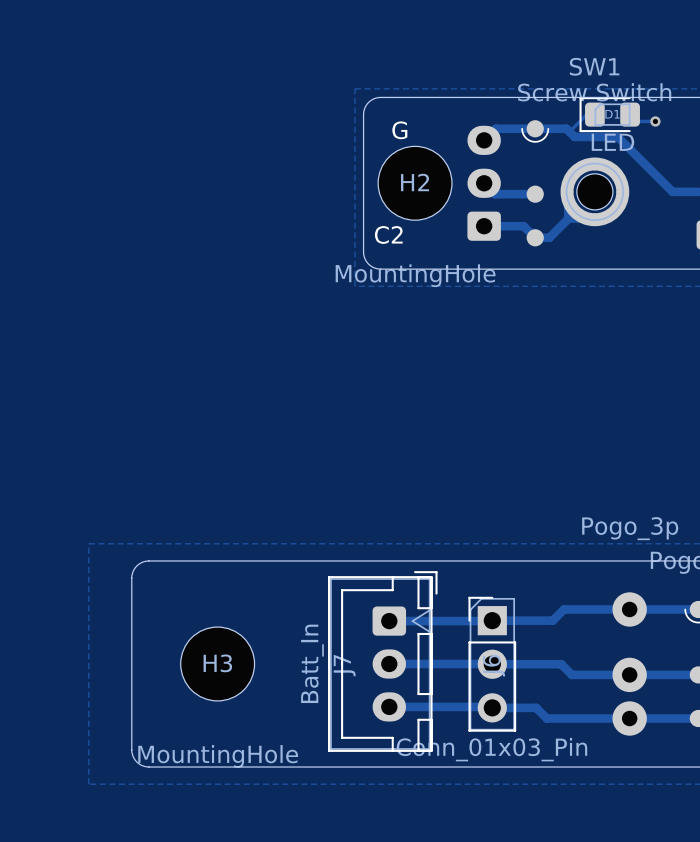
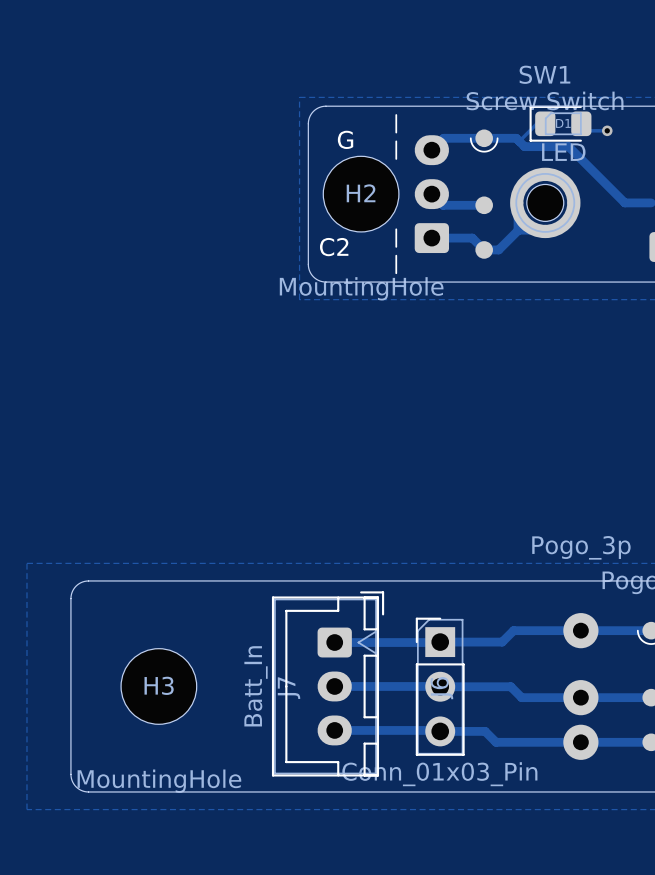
line: none -> (396, 114) (396, 132)
line: none -> (396, 141) (396, 158)
line: none -> (396, 229) (396, 246)
line: none -> (396, 255) (396, 273)

